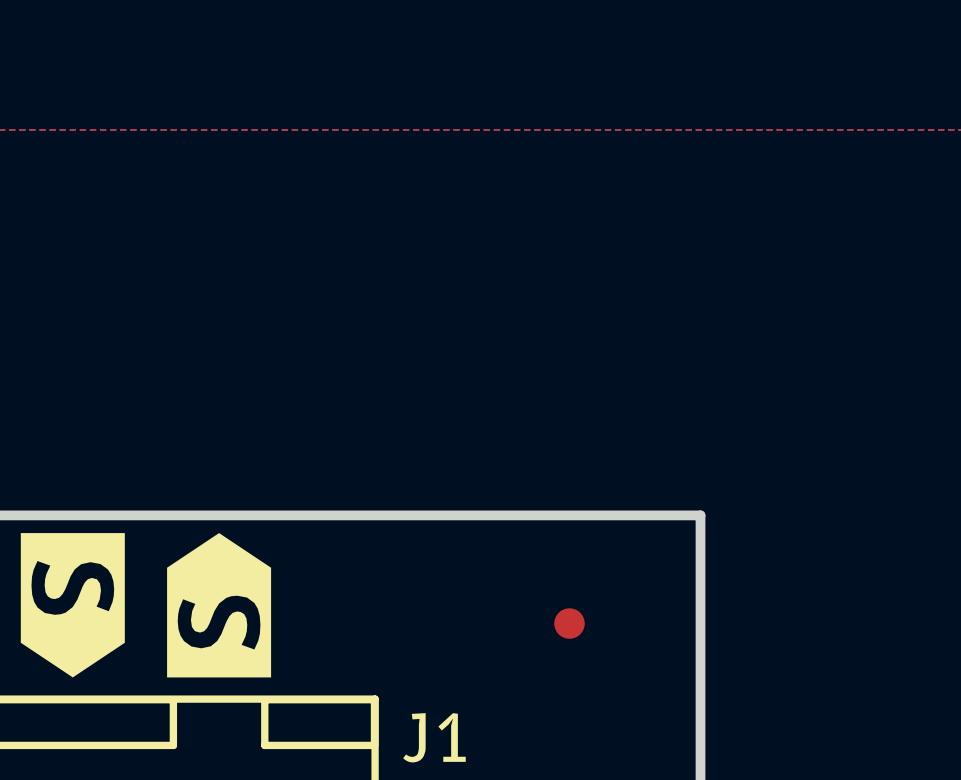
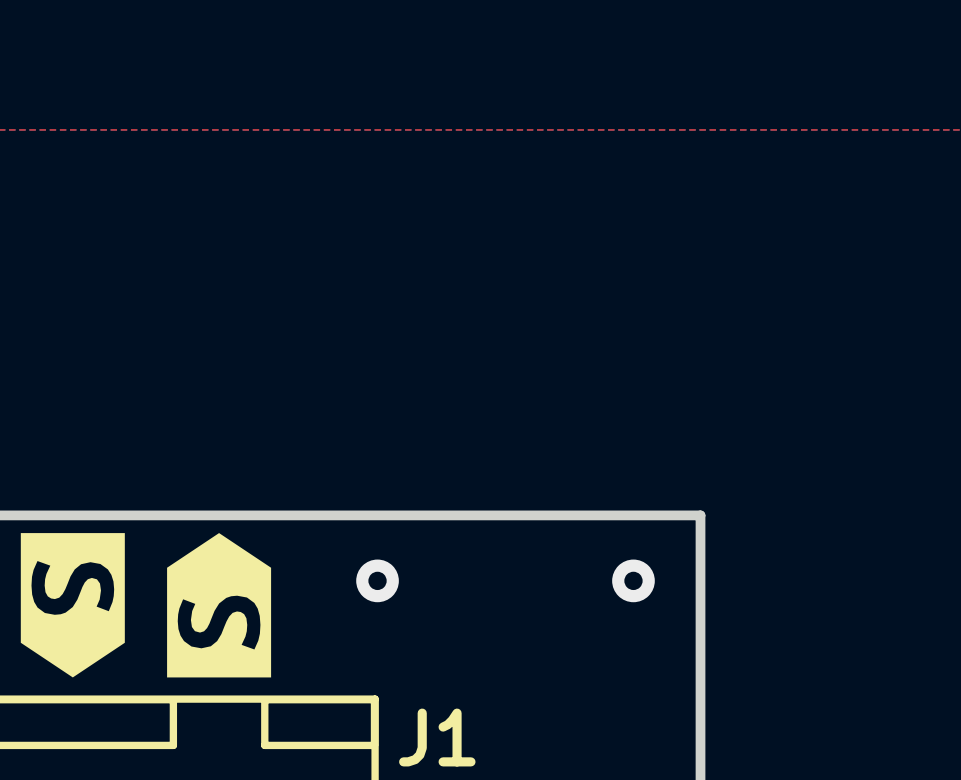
via: none -> (377, 580)
via: none -> (633, 580)
part: (569, 623) -> none

